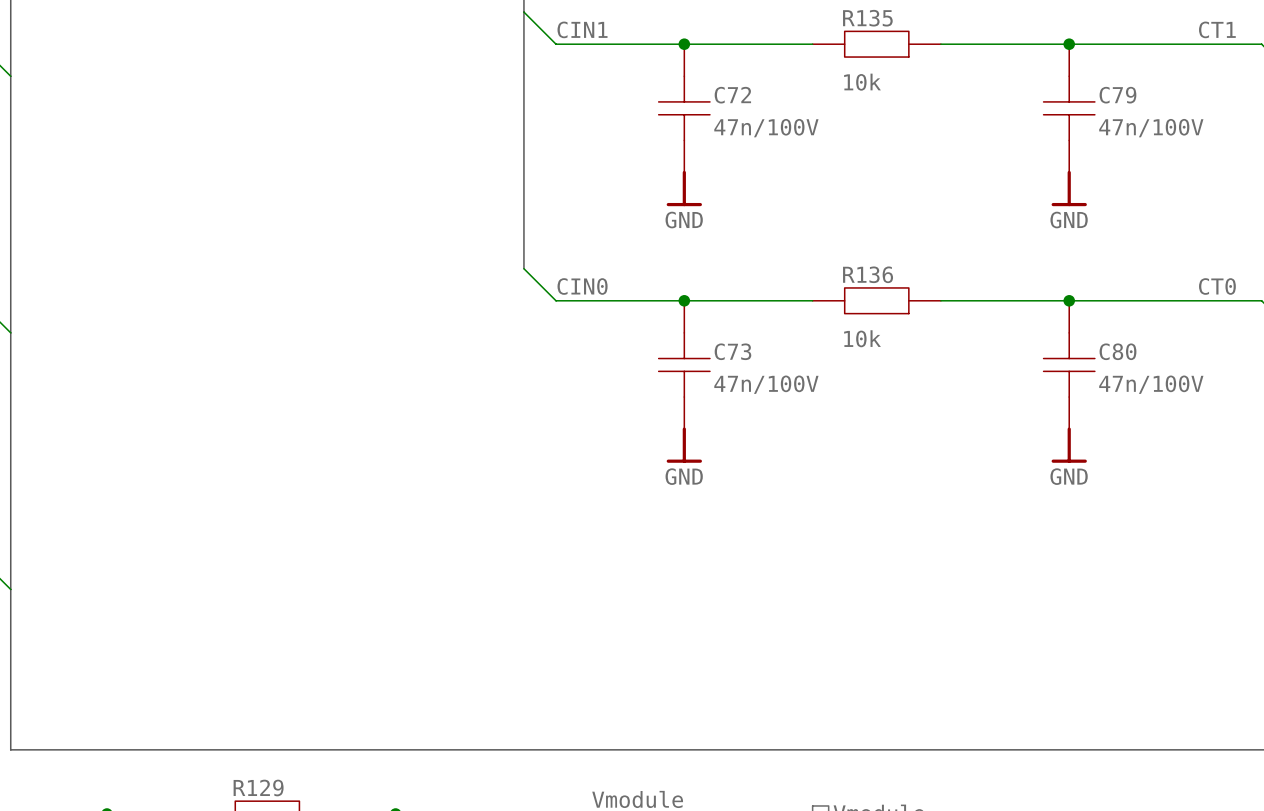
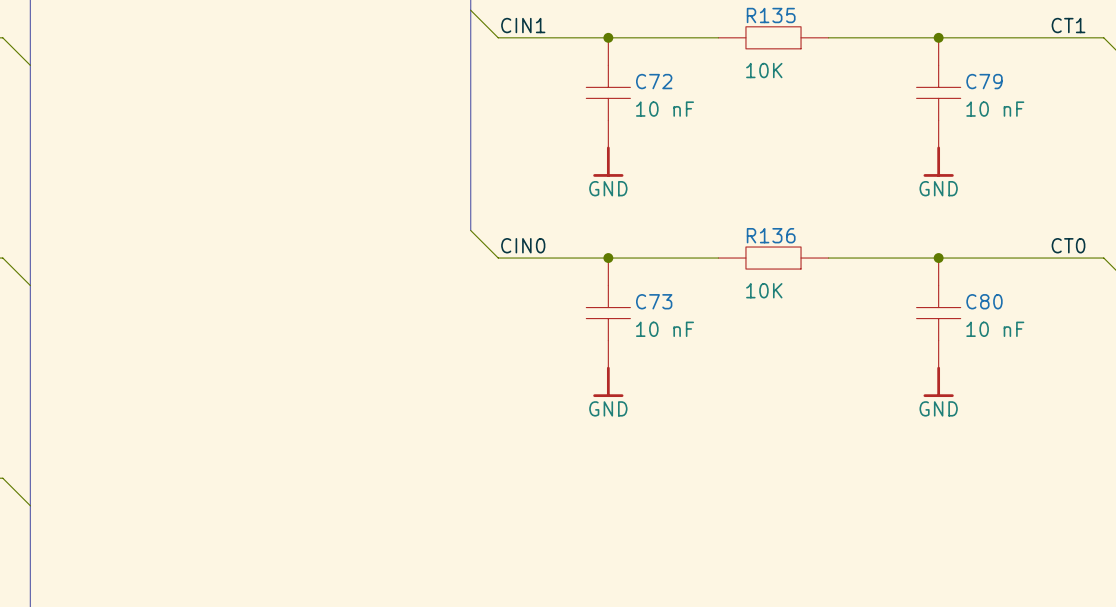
R135 value: 10k (862, 82) -> 10K (764, 70)
C72 value: 47n/100V (766, 128) -> 10 nF (665, 109)
C79 value: 47n/100V (1151, 128) -> 10 nF (995, 109)
R136 value: 10k (862, 338) -> 10K (764, 290)
C73 value: 47n/100V (766, 384) -> 10 nF (665, 329)
C80 value: 47n/100V (1151, 384) -> 10 nF (995, 329)

